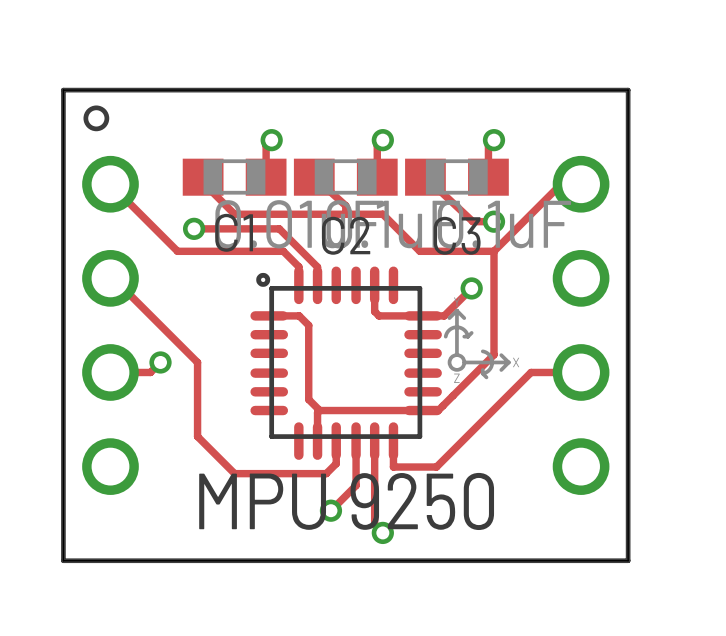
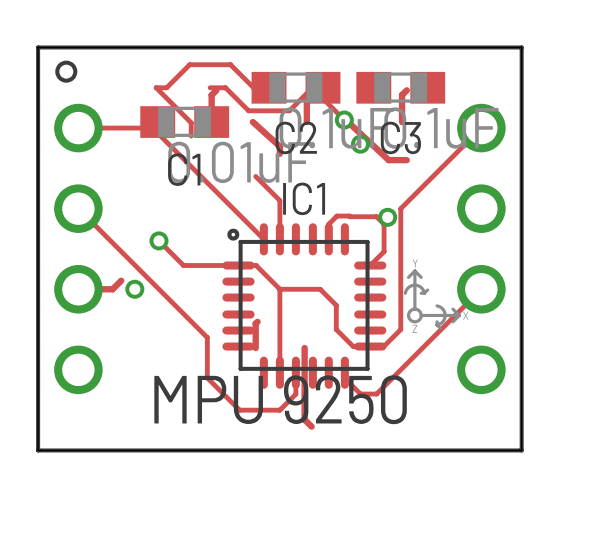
track: none -> (210, 87) (225, 87) (248, 110) (289, 110) (312, 87) (322, 87) (322, 98) (344, 120)
track: none -> (269, 87) (253, 87) (230, 64) (189, 64) (166, 87) (156, 87) (191, 122) (191, 136)
via: (271, 140) -> none
via: (382, 140) -> none
via: (494, 140) -> none
via: none -> (344, 120)
track: (203, 177) (203, 182) (234, 214) (382, 214) (419, 251) (494, 251) -> none
C2 position: (345, 177) -> (296, 87)
C3 position: (456, 177) -> (400, 87)
track: (110, 184) (177, 251) (283, 251) (298, 266) (298, 285) -> (78, 128) (152, 128) (263, 239)
track: (581, 184) (561, 184) (494, 251) -> (481, 128) (400, 208) (400, 329) (383, 346) (353, 346) (336, 329) (336, 305) (320, 289) (279, 289)
via: none -> (360, 144)
via: (494, 221) -> none
track: (194, 228) (279, 228) (317, 267) (317, 285) -> none
via: (194, 228) -> none
track: none -> (255, 176) (279, 200) (279, 239)
track: (494, 251) (494, 354) (438, 410) (319, 410) (308, 399) (308, 325) (299, 315) (269, 315) -> none
track: (110, 278) (113, 278) (197, 362) (197, 436) (234, 473) (326, 473) (336, 463) (336, 441) -> (78, 208) (207, 337) (207, 377) (239, 410) (279, 410) (295, 394) (295, 372)
track: (374, 285) (374, 311) (379, 315) (444, 315) (471, 288) -> none
track: none -> (328, 239) (328, 224) (336, 216) (376, 216) (384, 224) (384, 251) (370, 265)
track: none -> (158, 240) (183, 265) (256, 265) (279, 289)
via: none -> (158, 240)
via position: (160, 362) -> (134, 289)
part: (380, 363) -> none
track: none -> (279, 289) (279, 372)
track: (581, 372) (531, 372) (436, 467) (393, 467) (393, 441) -> (481, 289) (376, 394) (360, 394) (344, 378) (344, 372)
IC1: none -> (341, 306)
track: (356, 441) (356, 485) (330, 510) -> none
via: (330, 510) -> none
via: (382, 532) -> none

